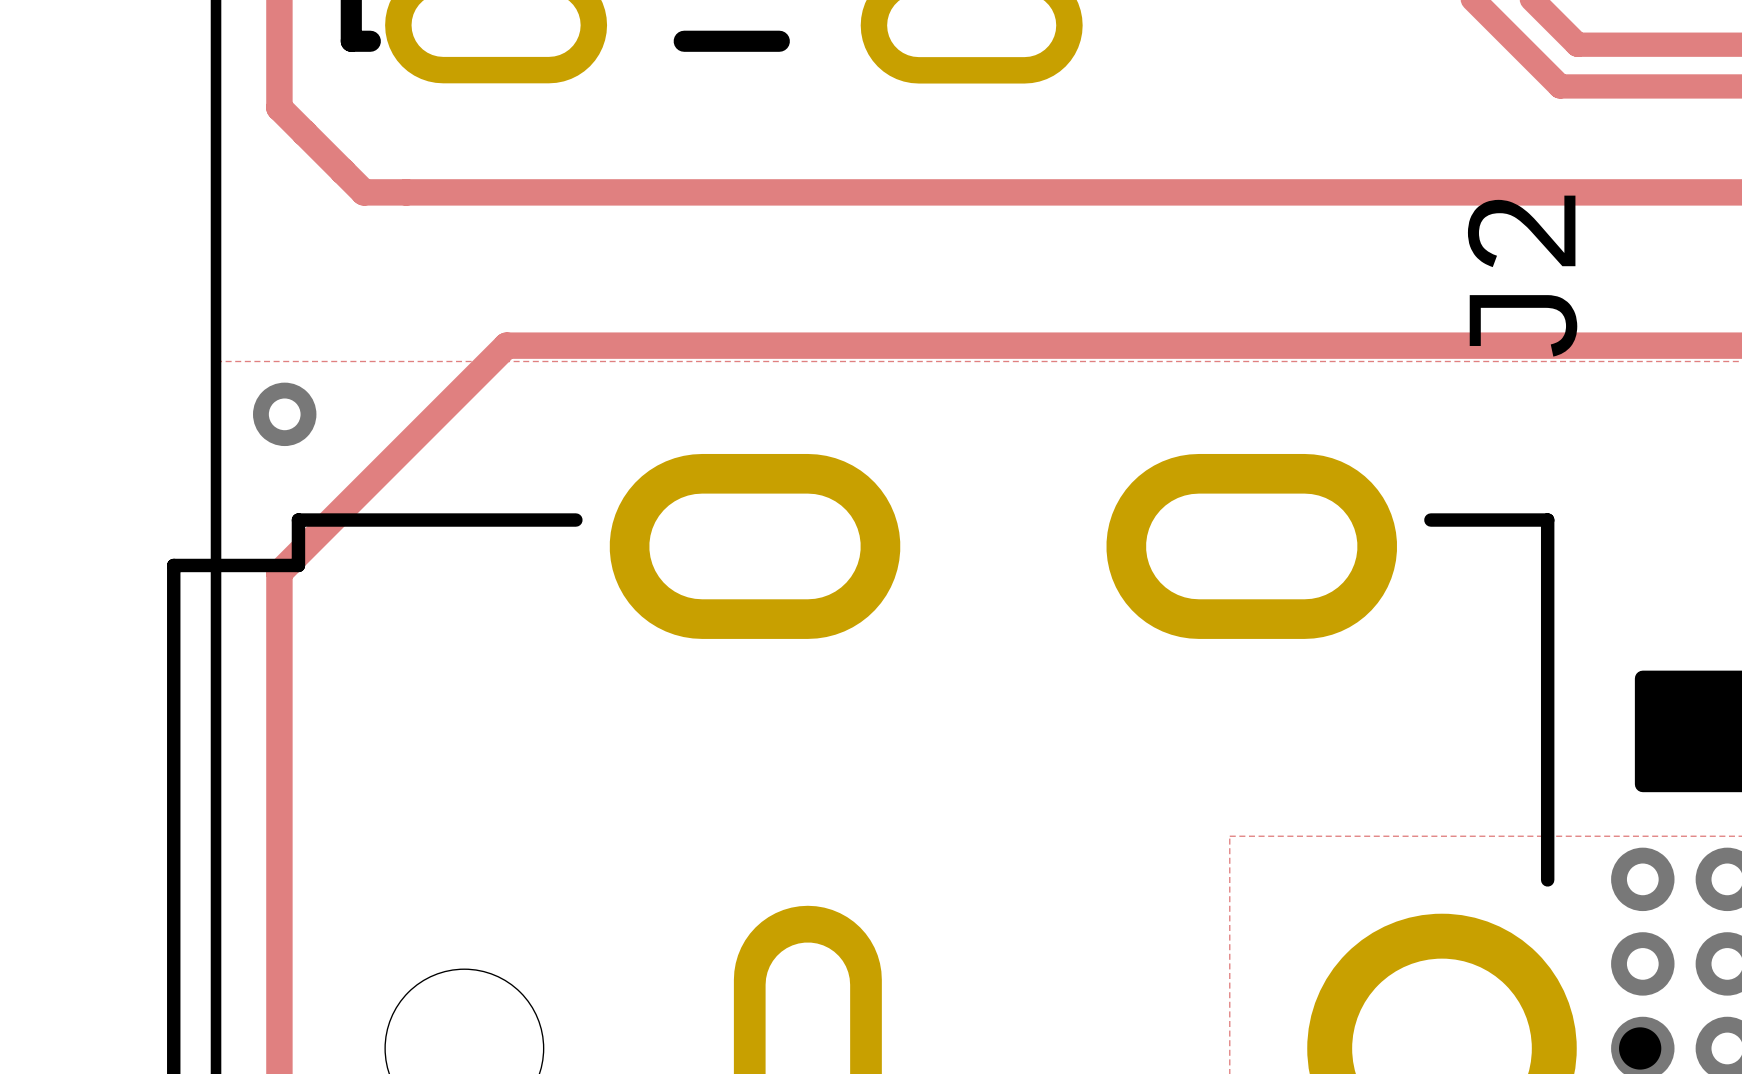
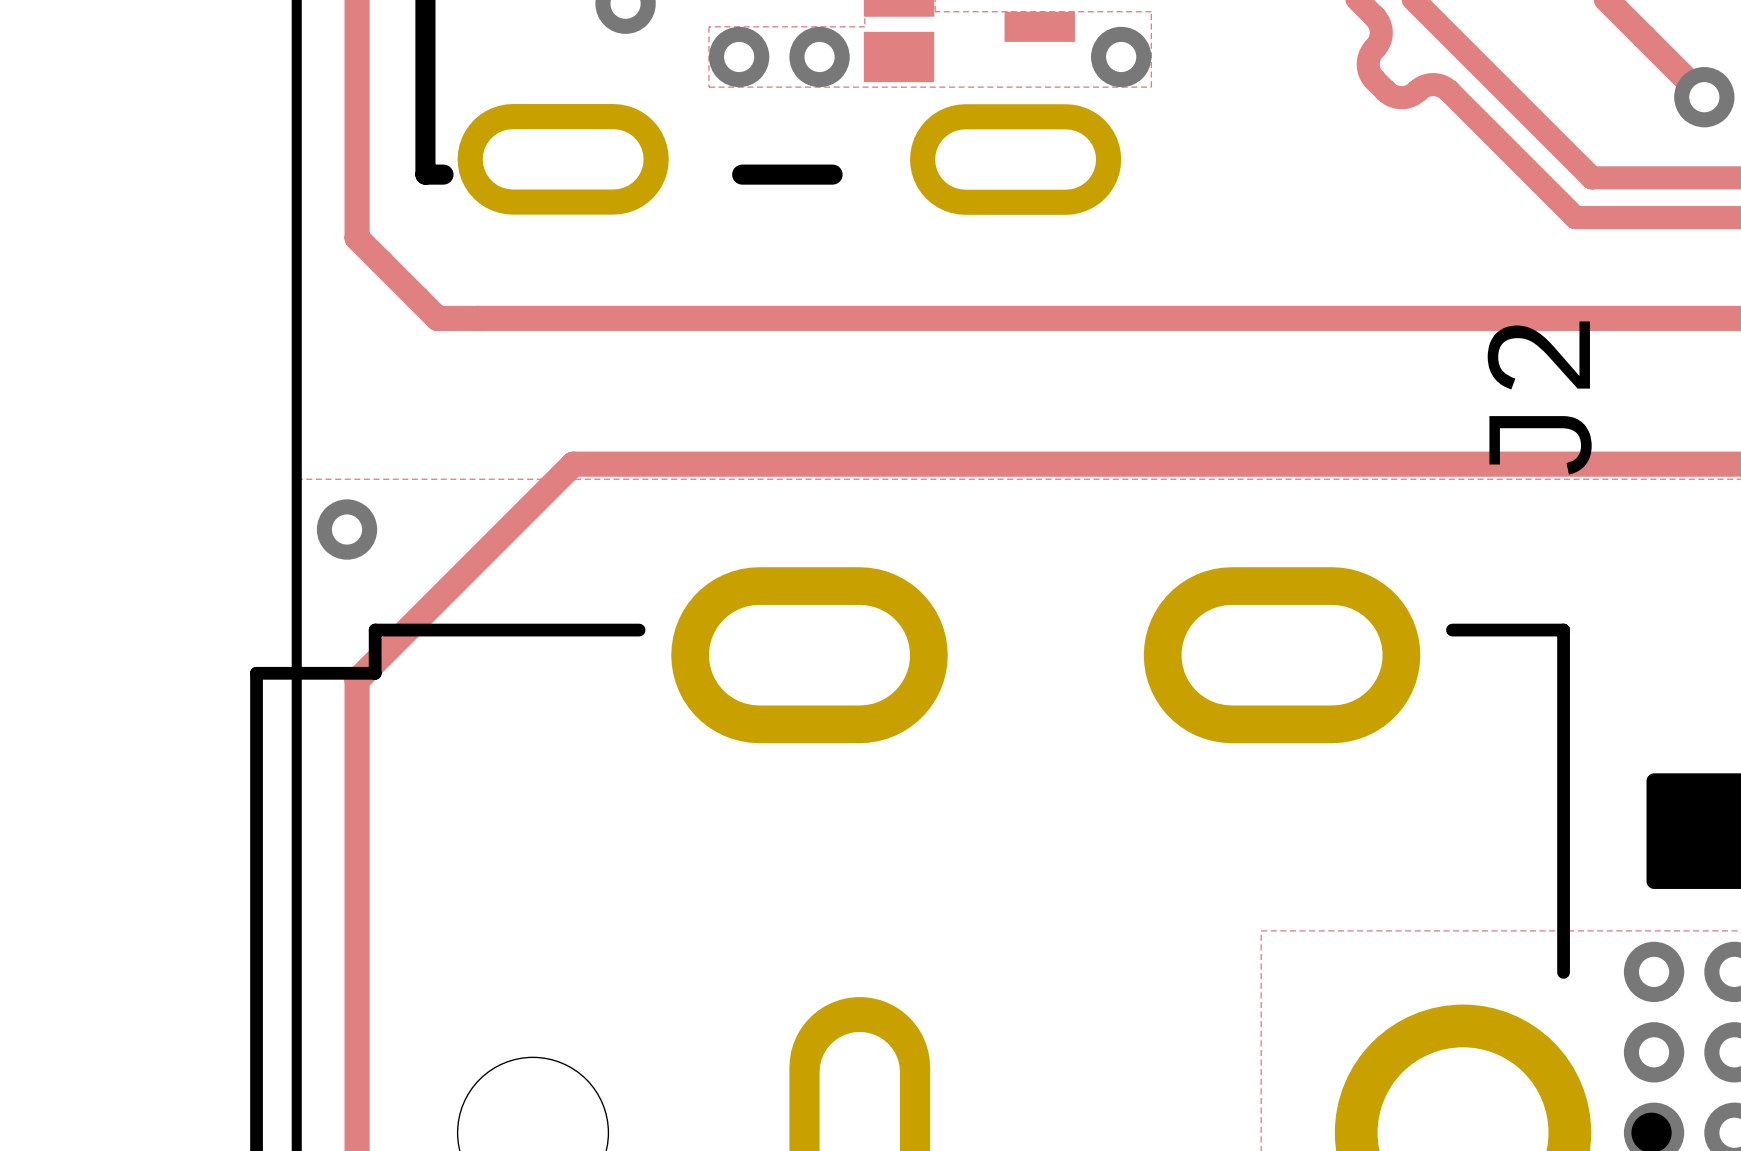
via position: (284, 414) -> (347, 529)

